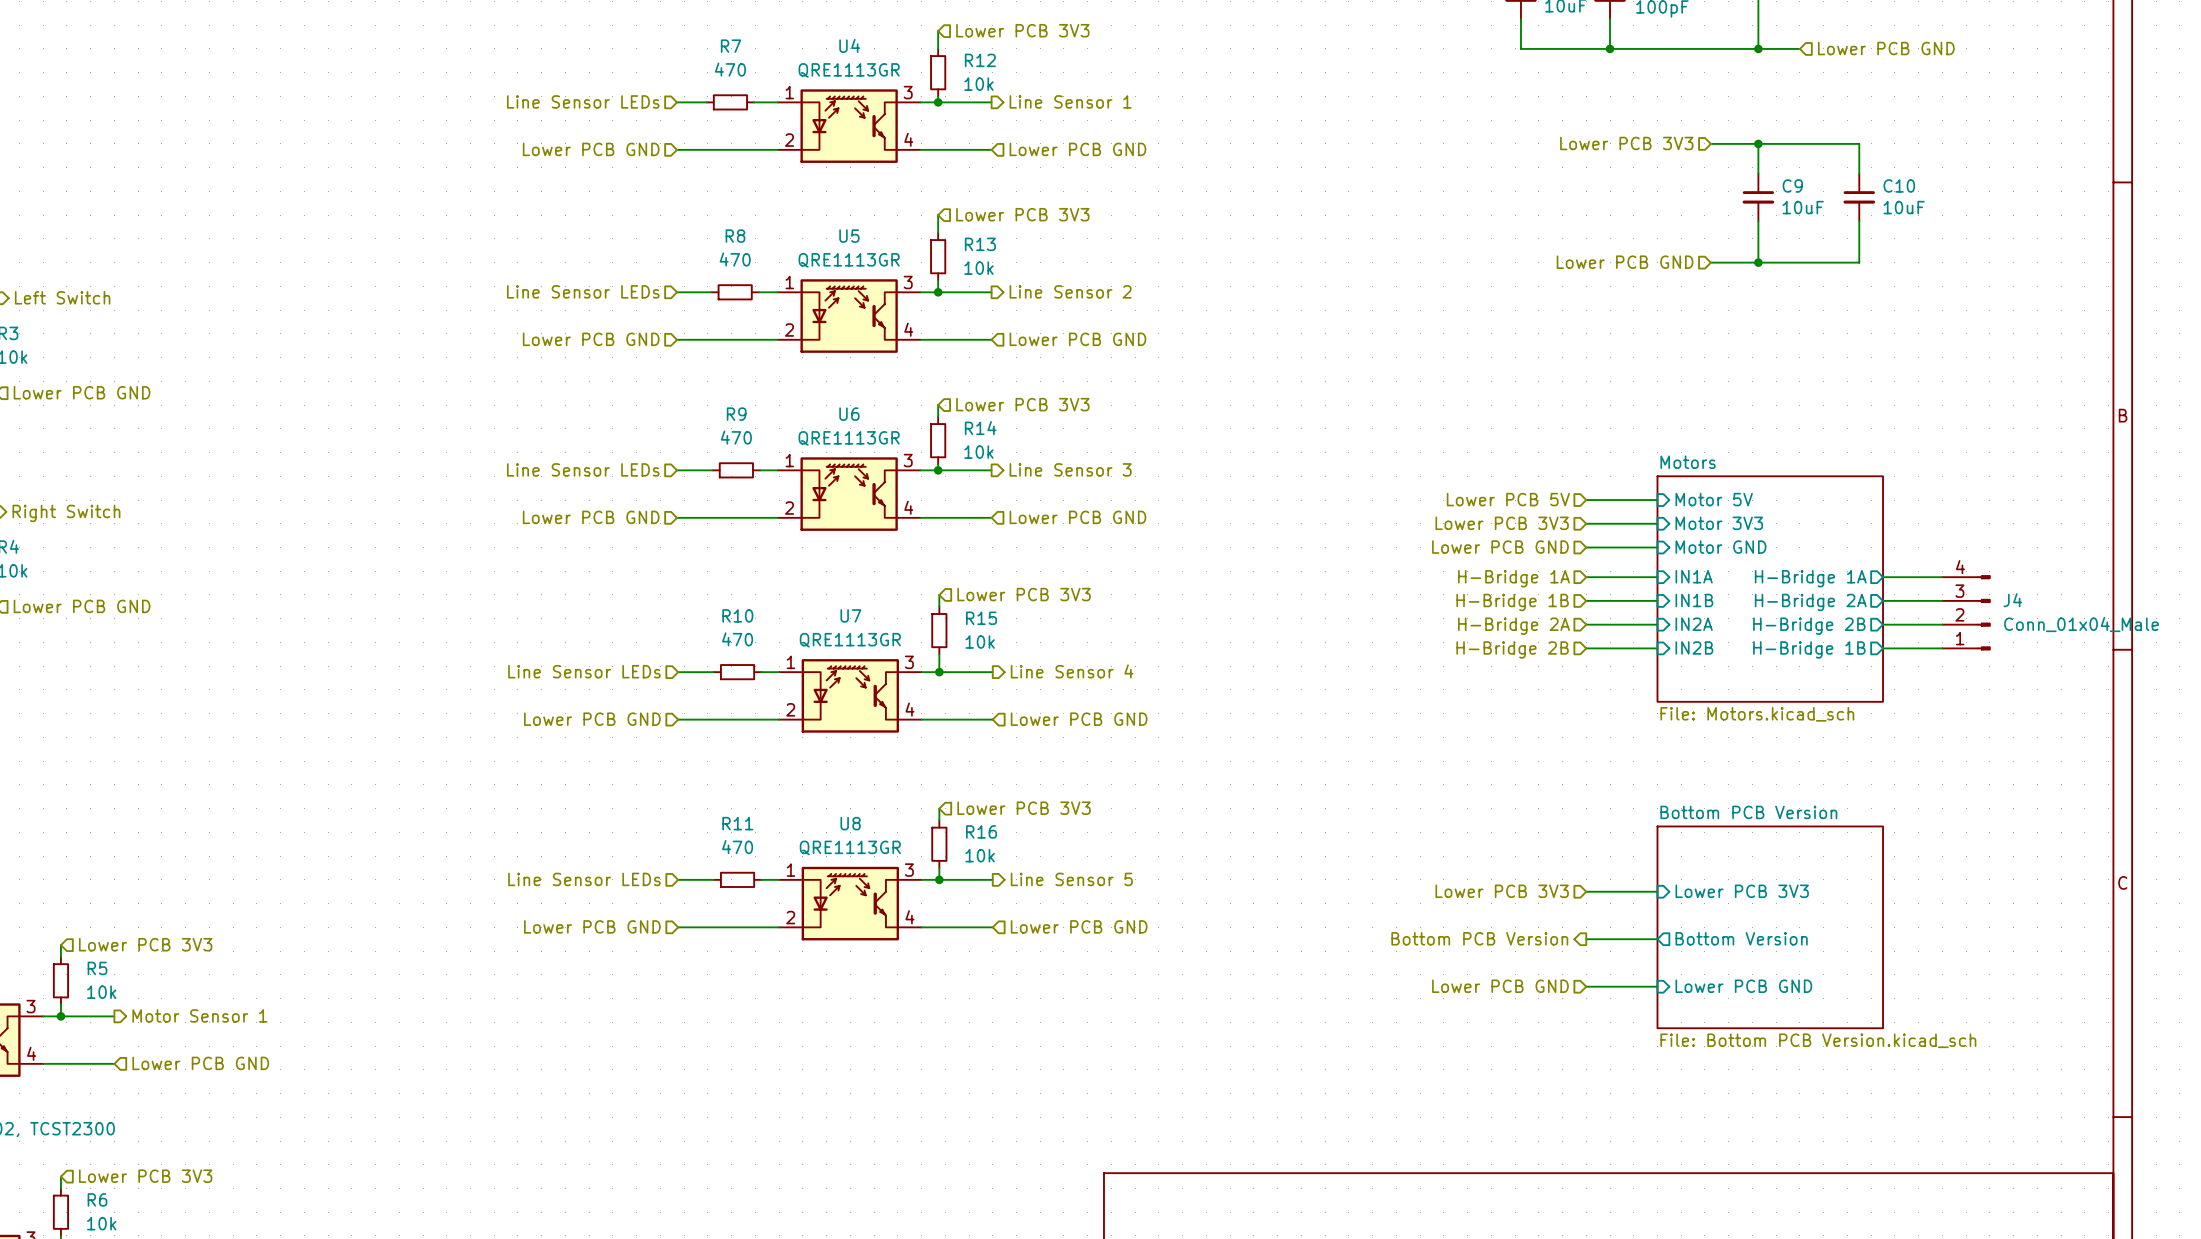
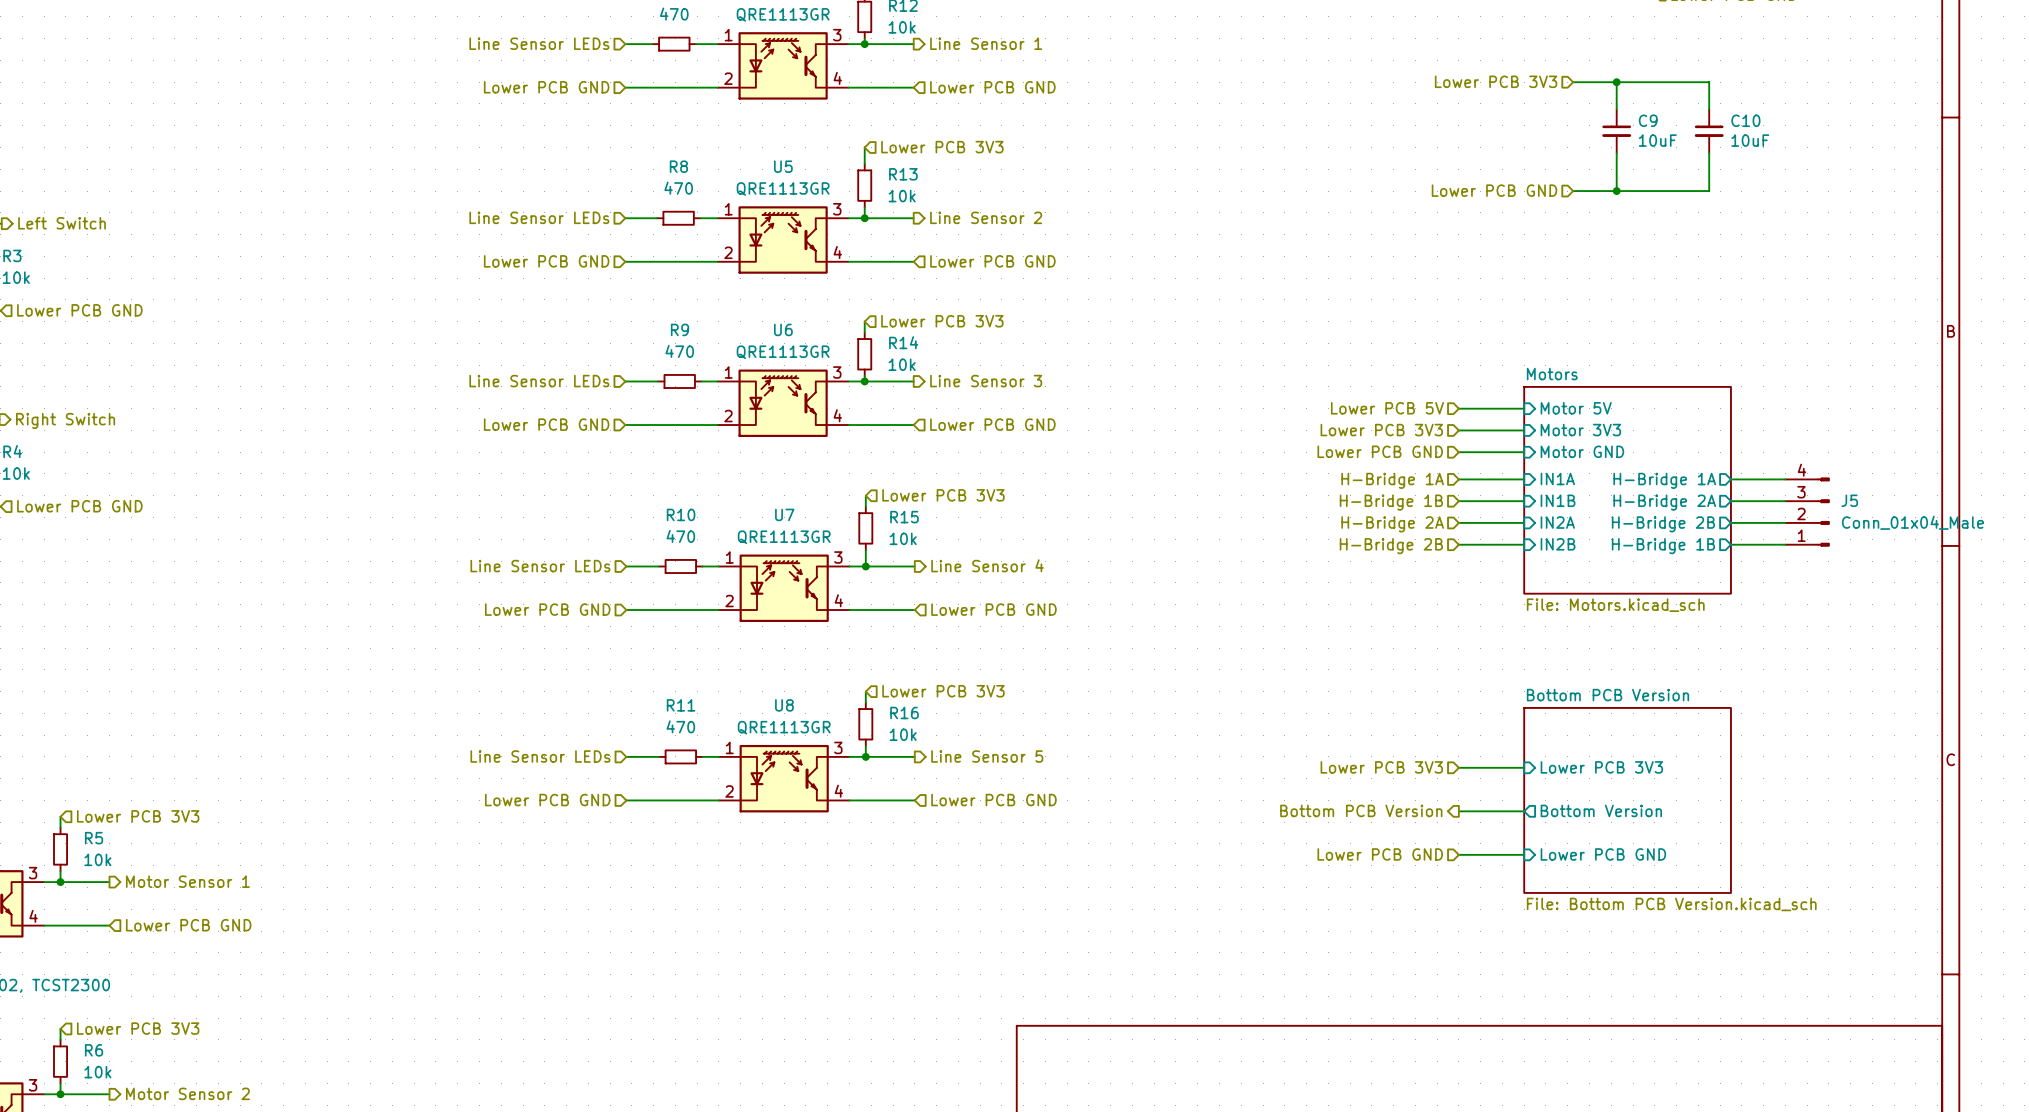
J4 name: J4 (2012, 600) -> J5 (1849, 500)

